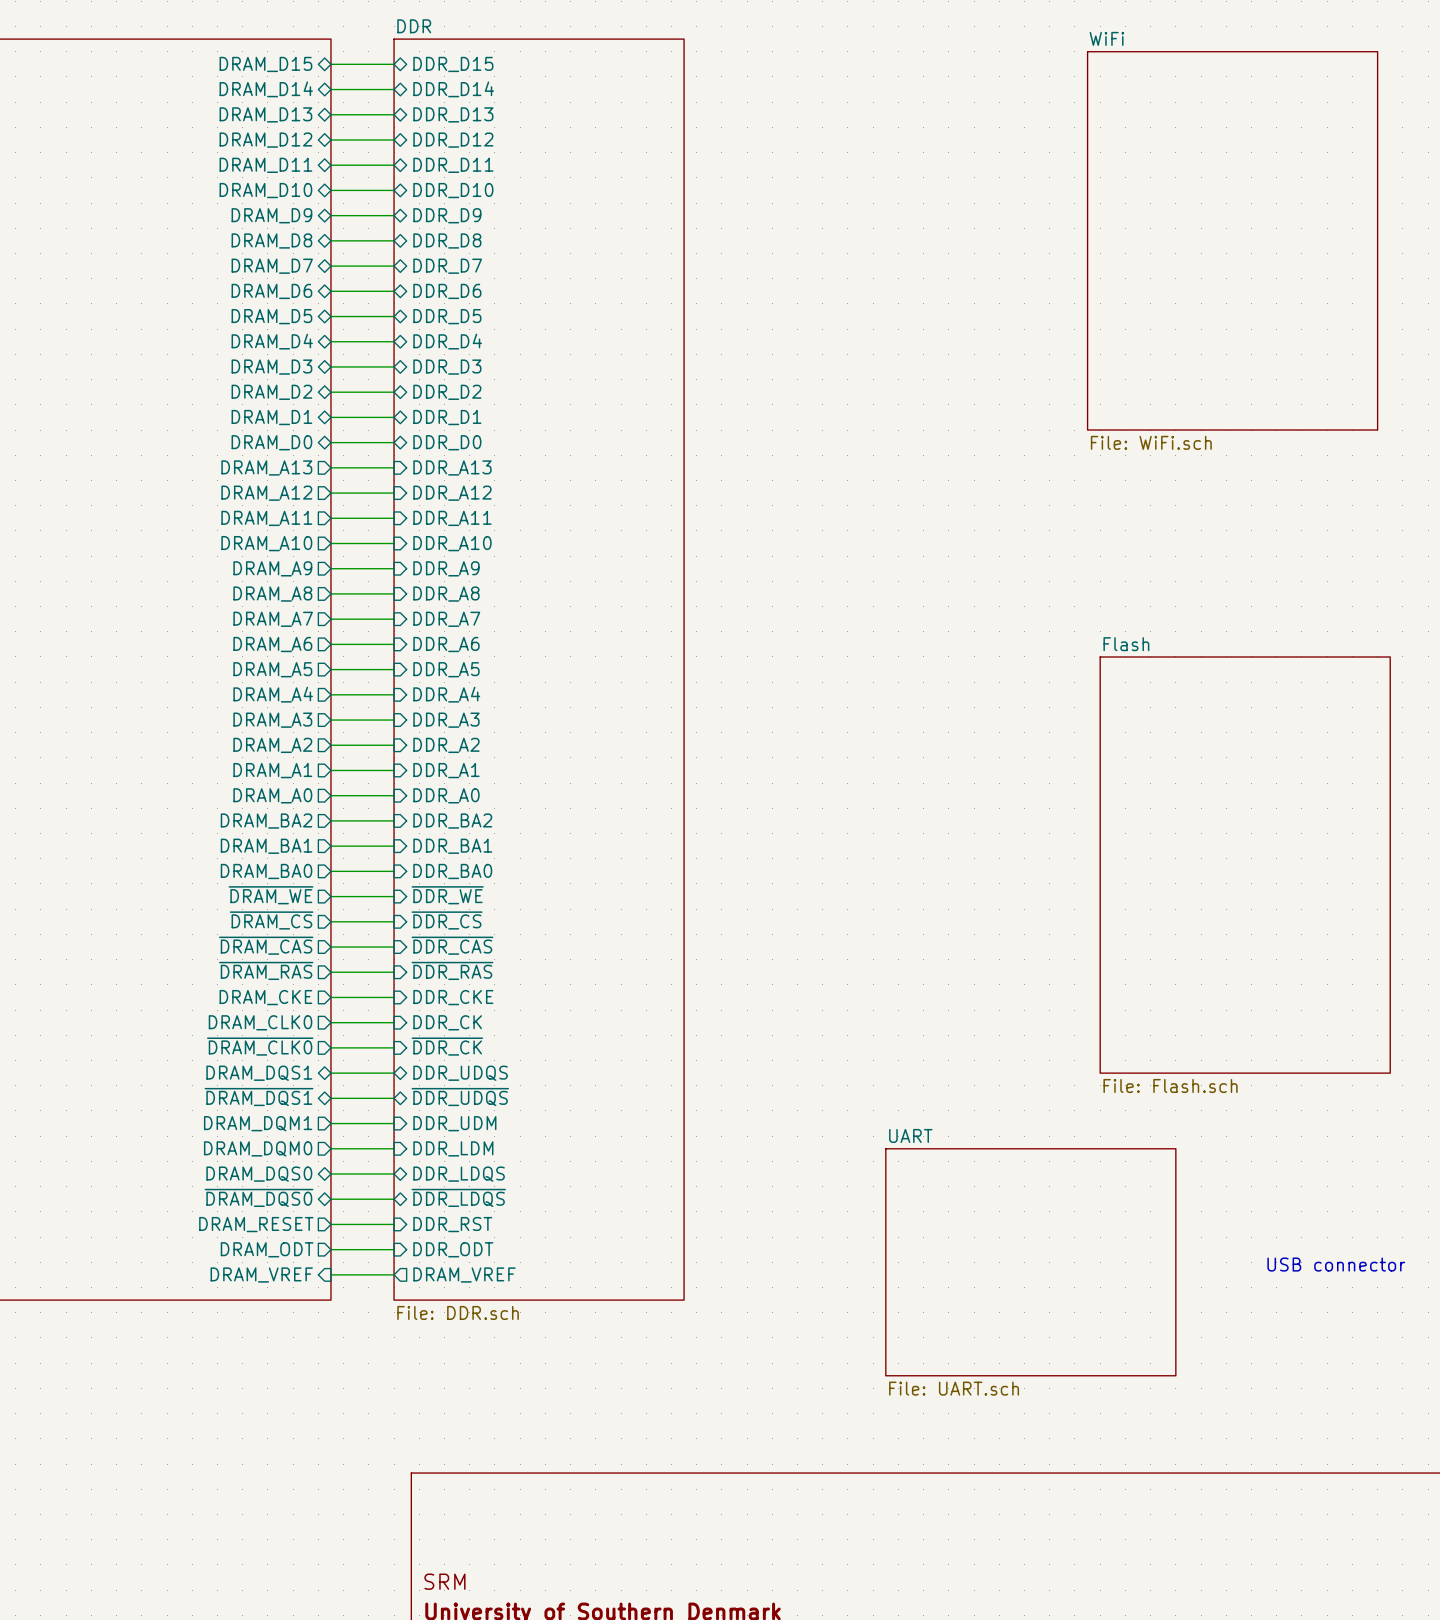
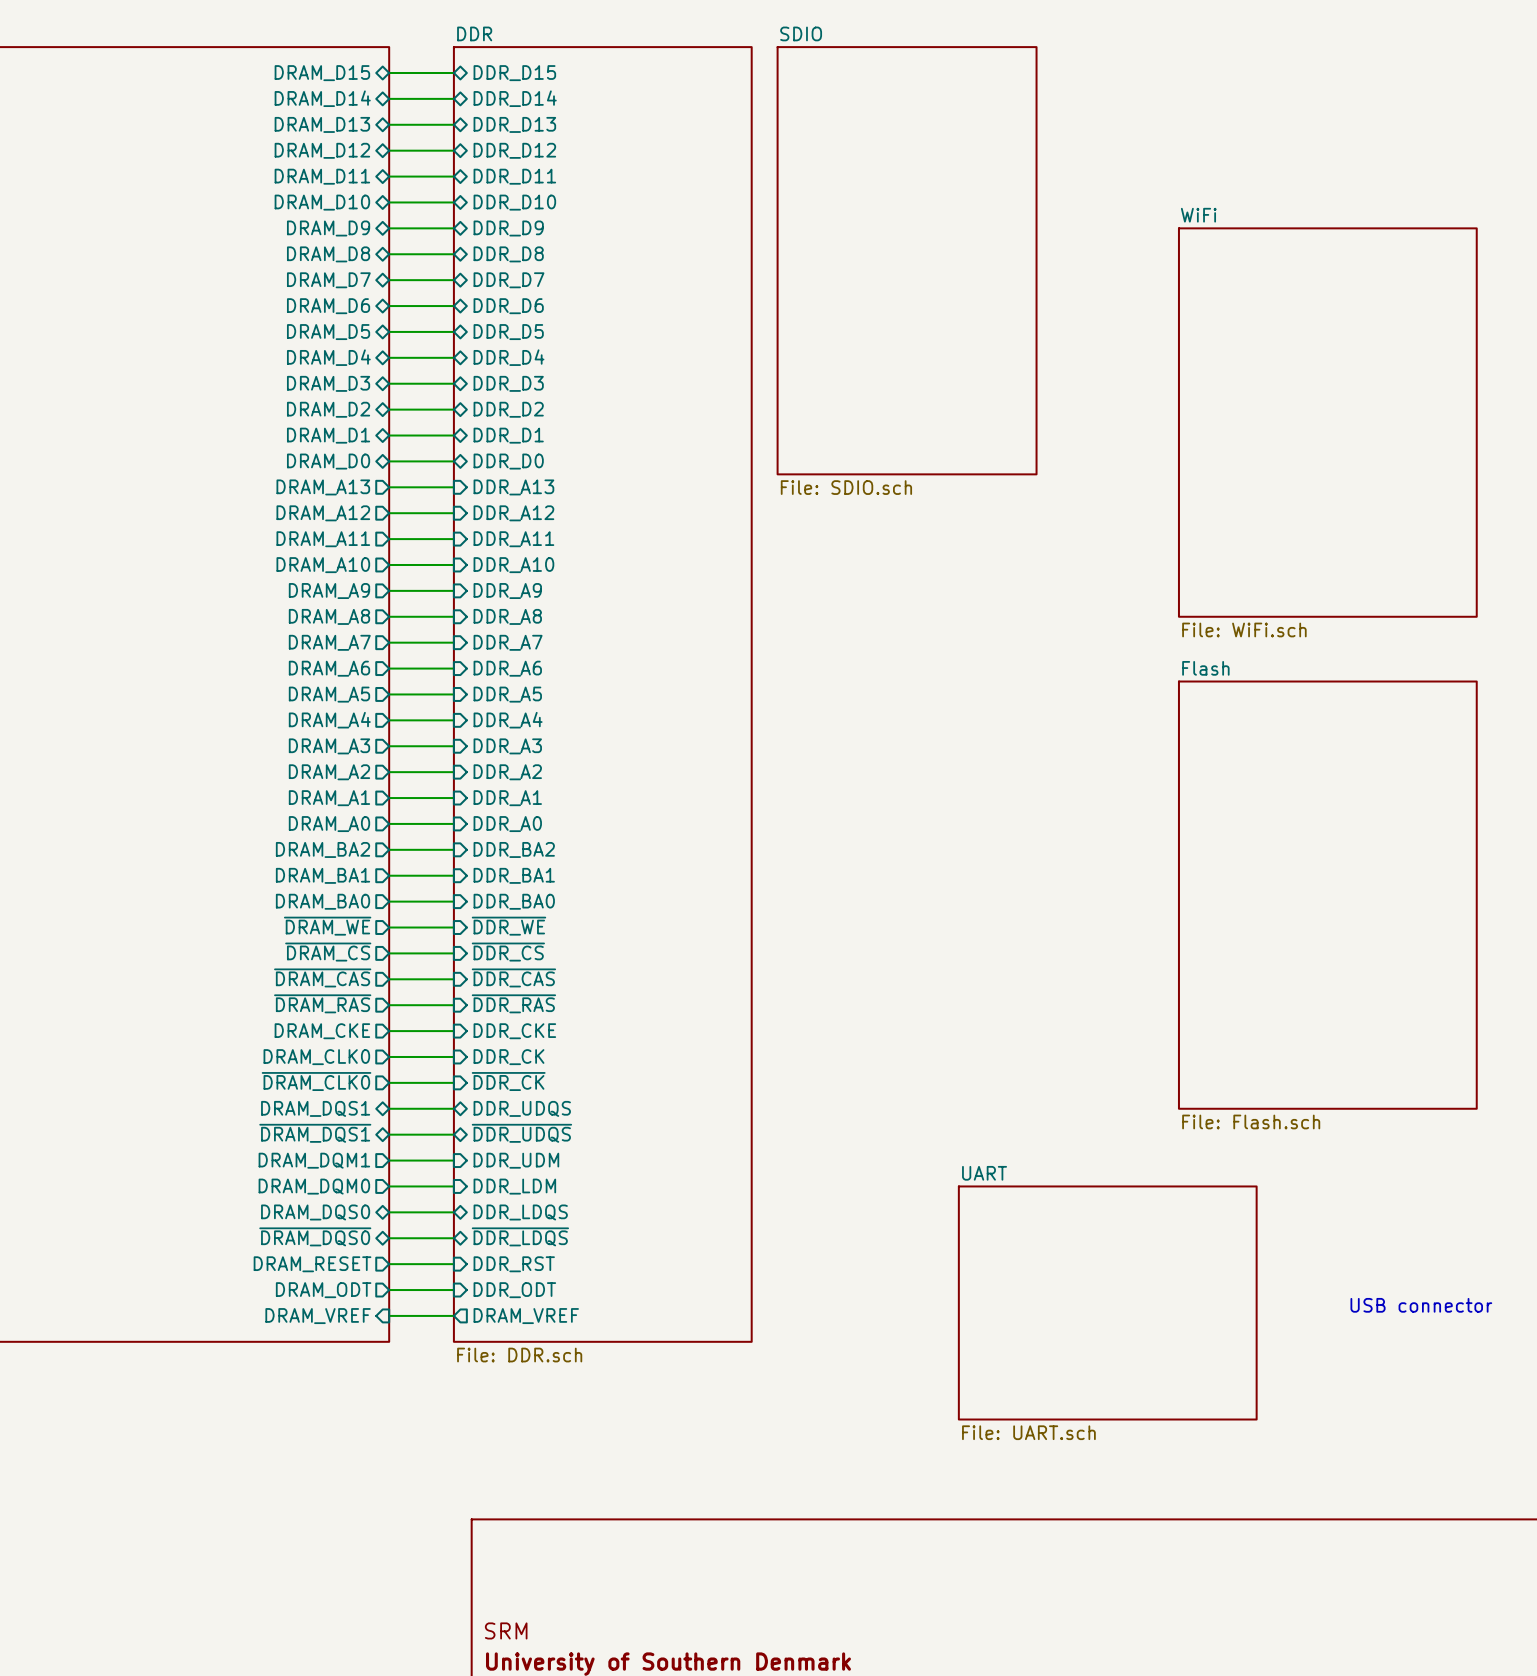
sheet WiFi position: (1232, 240) -> (1327, 422)
sheet SDIO: none -> File: SDIO.sch (907, 260)

